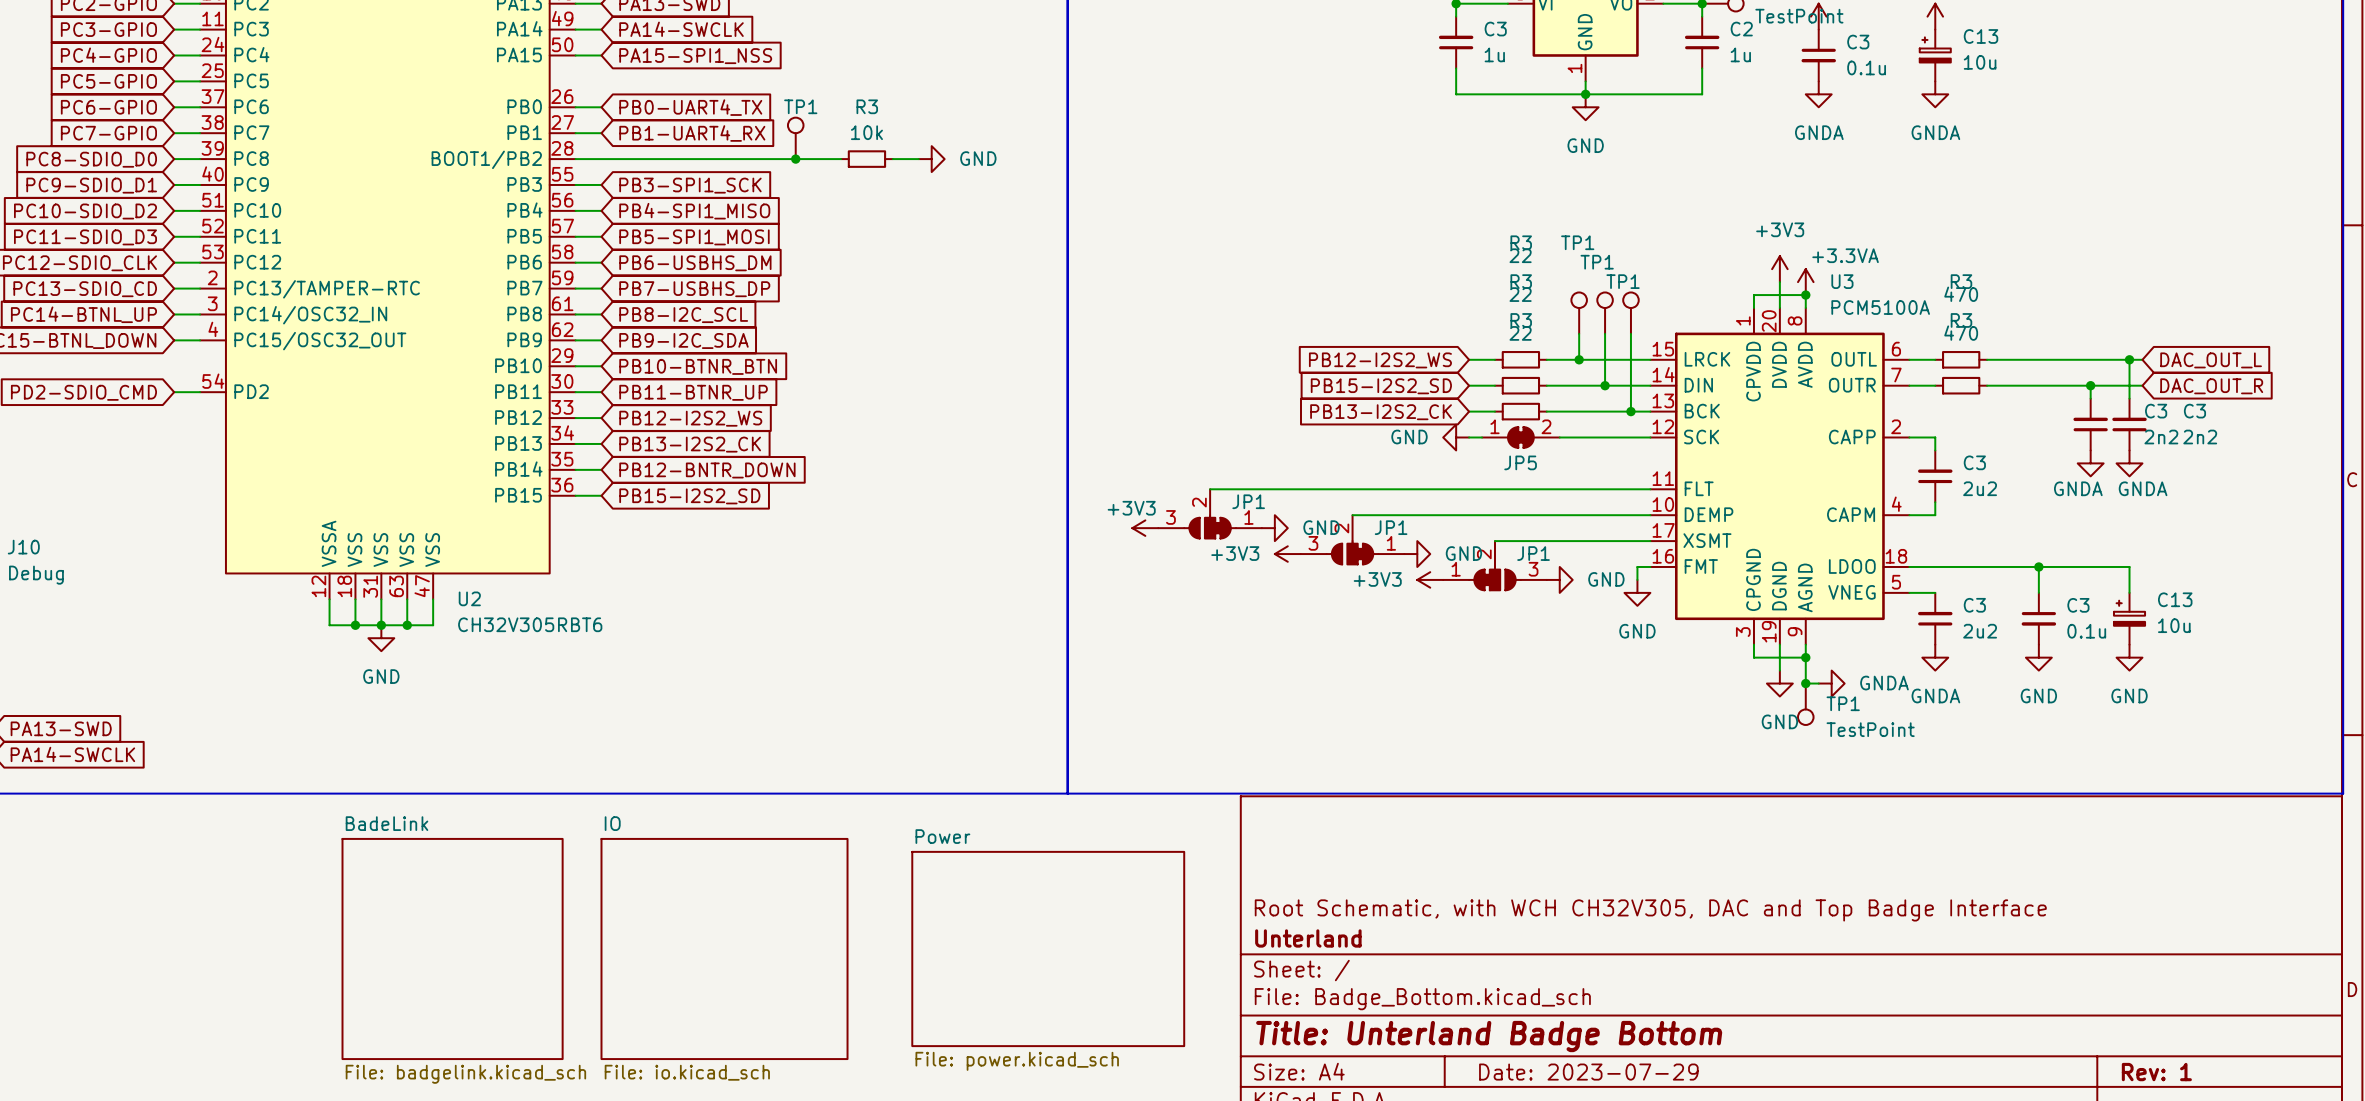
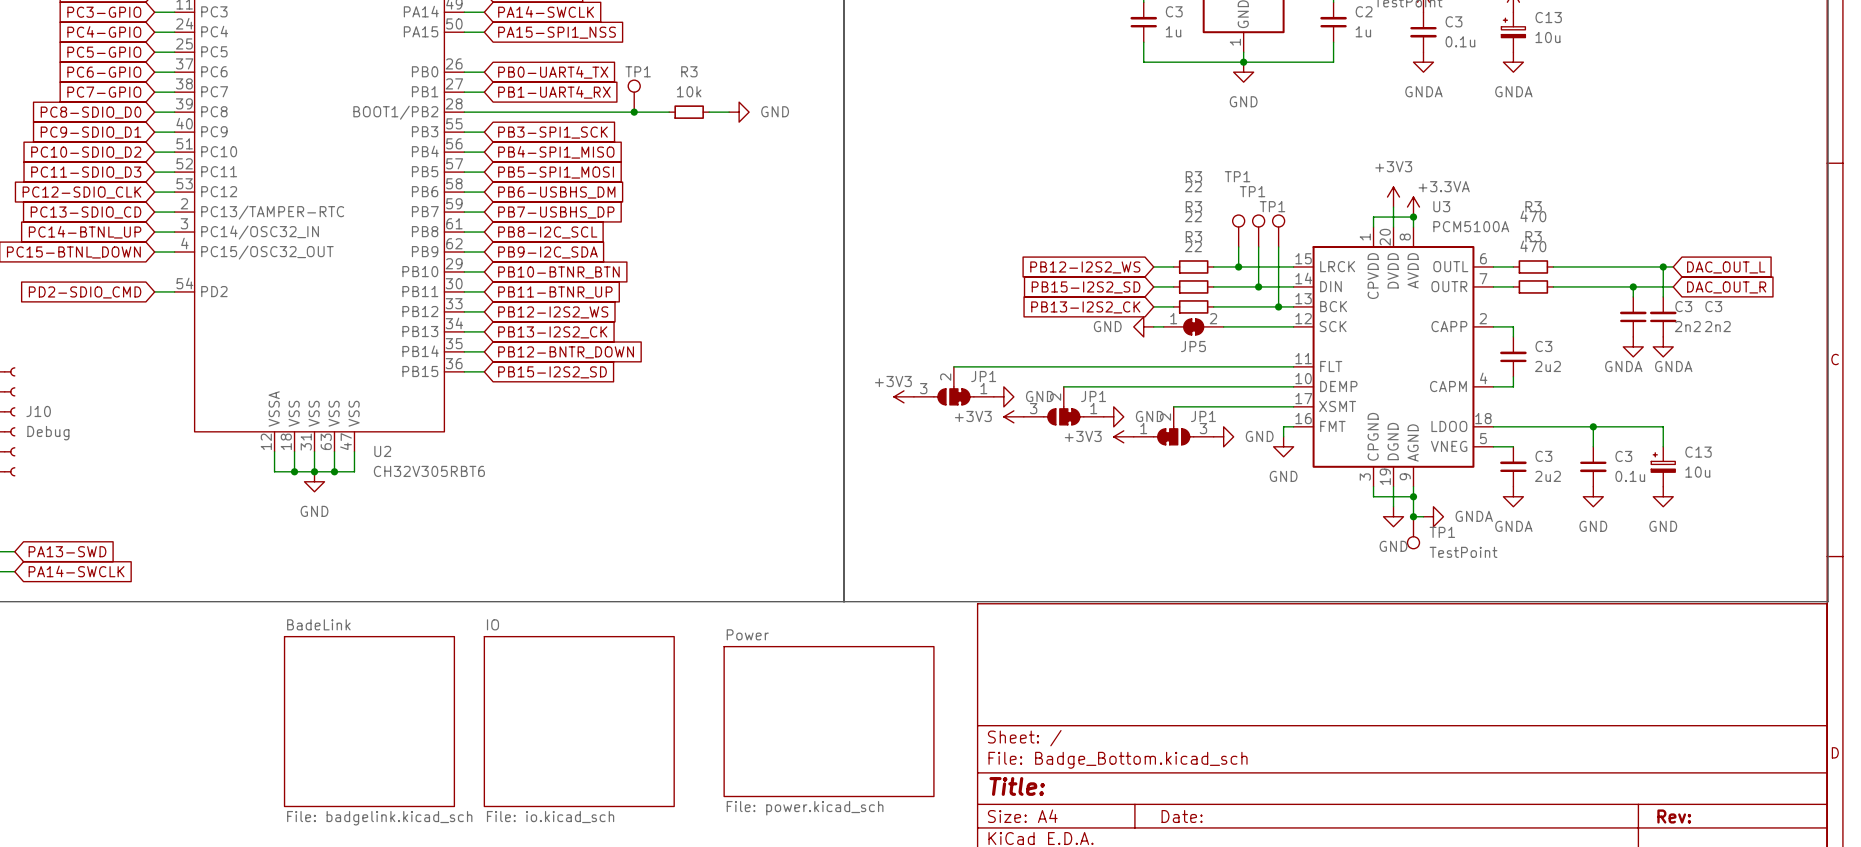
title block: Root Schematic, with WCH CH32V305, DAC and Top Badge Interface (1650, 910) -> none
title block: Unterland (1308, 938) -> none
title block: Title: Unterland Badge Bottom (1489, 1036) -> Title: (1017, 786)
title block: Date: 2023-07-29 (1588, 1072) -> Date: (1182, 816)
title block: Rev: 1 (2156, 1072) -> Rev: (1674, 816)

